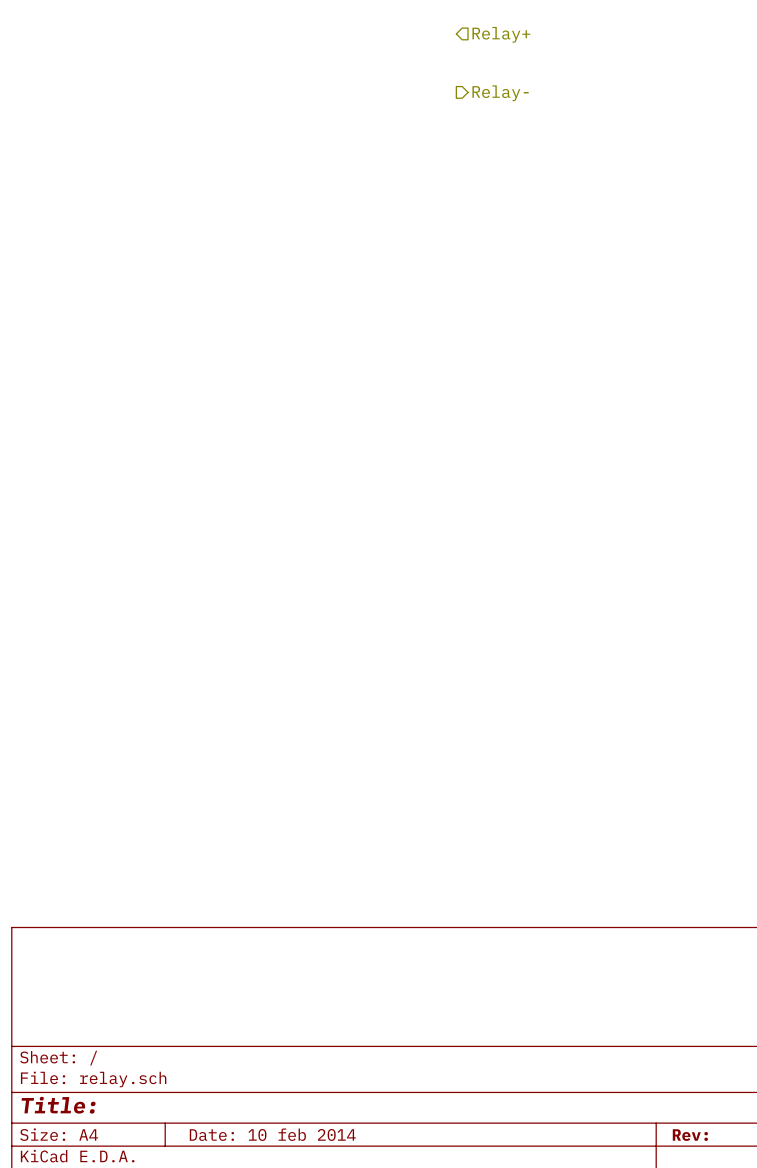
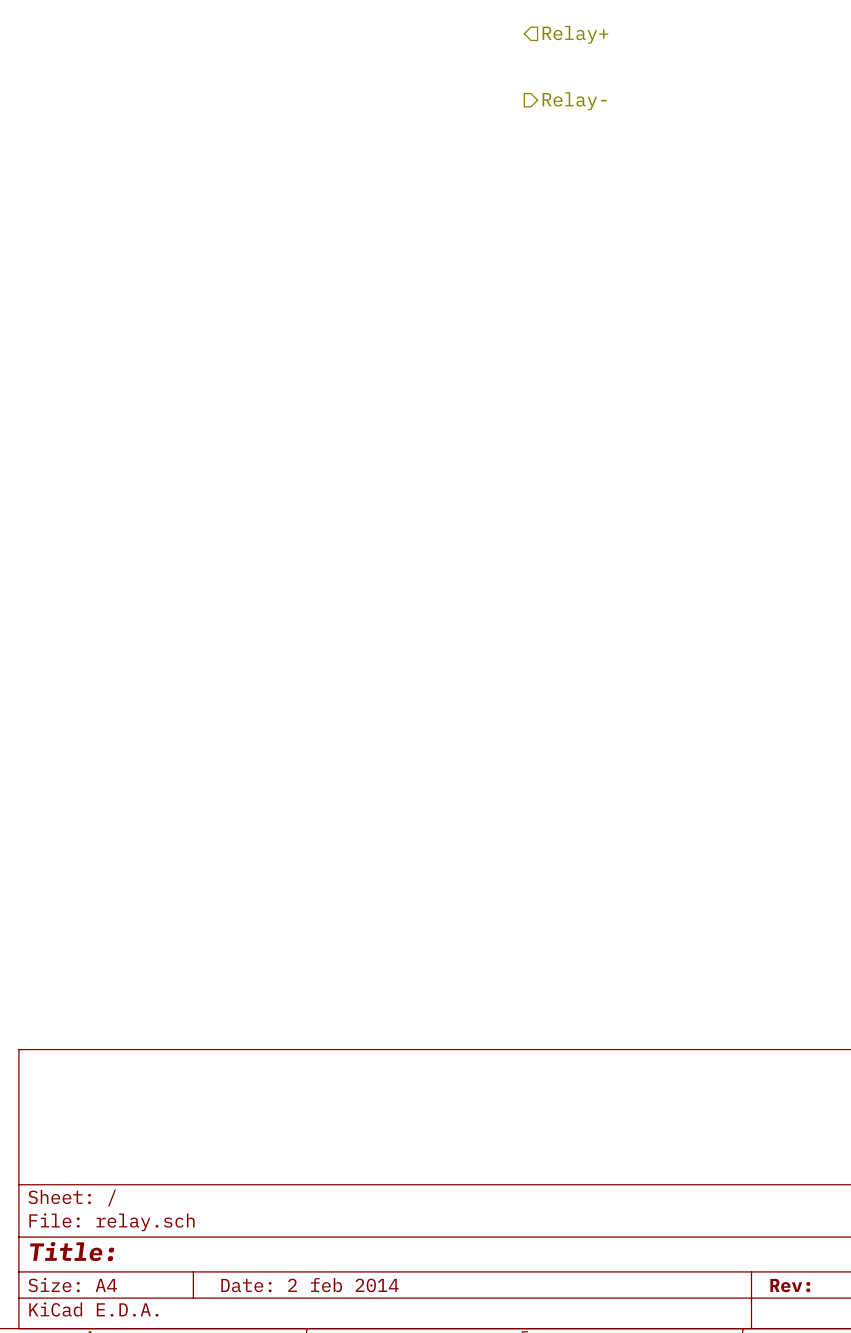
title block: Date: 10 feb 2014 (272, 1134) -> Date: 2 feb 2014 (310, 1285)

